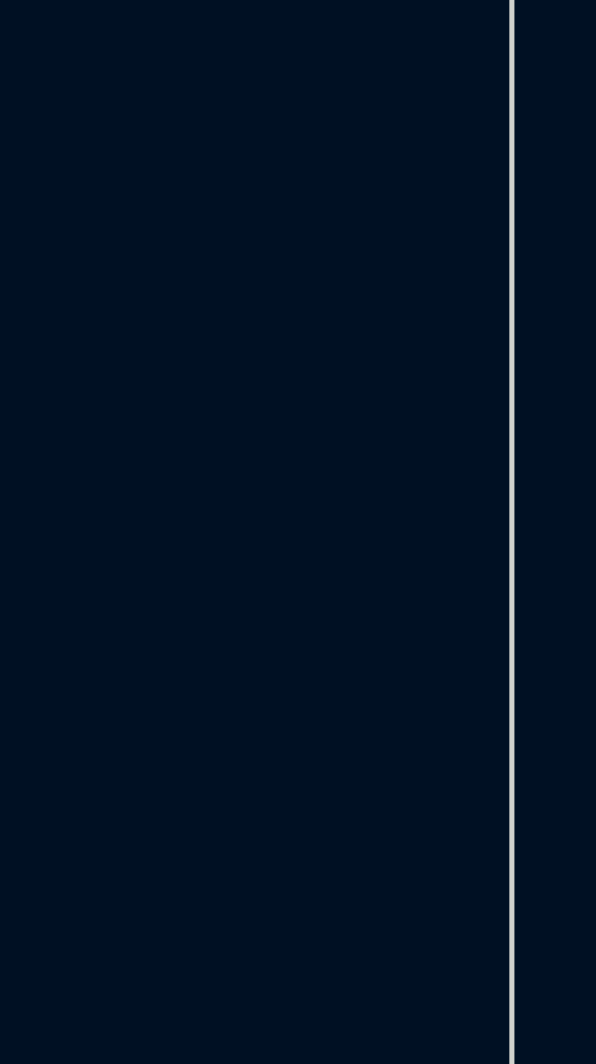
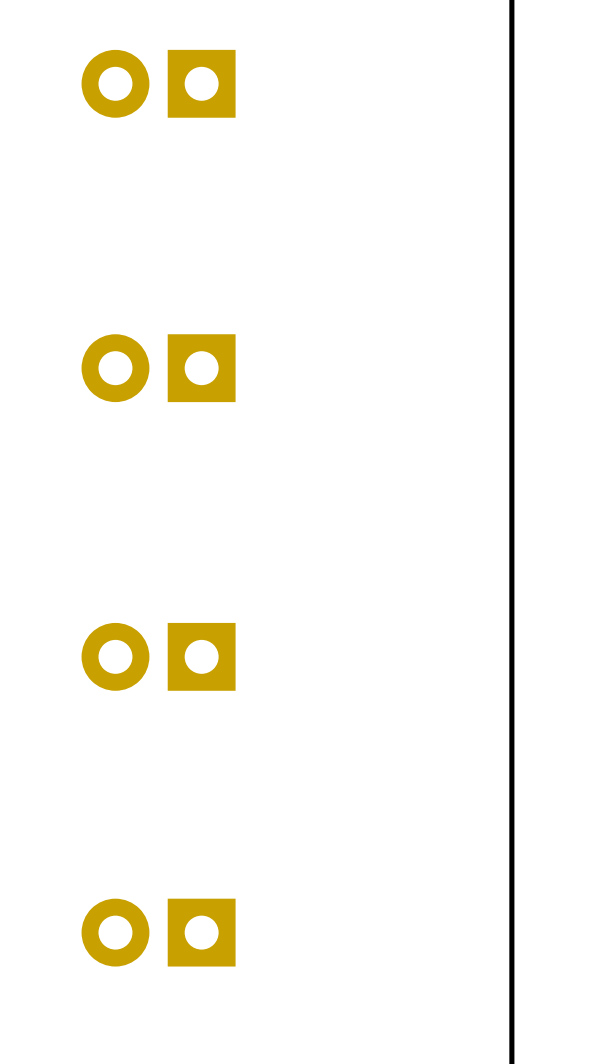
part: none -> (158, 83)
part: none -> (158, 368)
part: none -> (158, 656)
part: none -> (158, 932)

